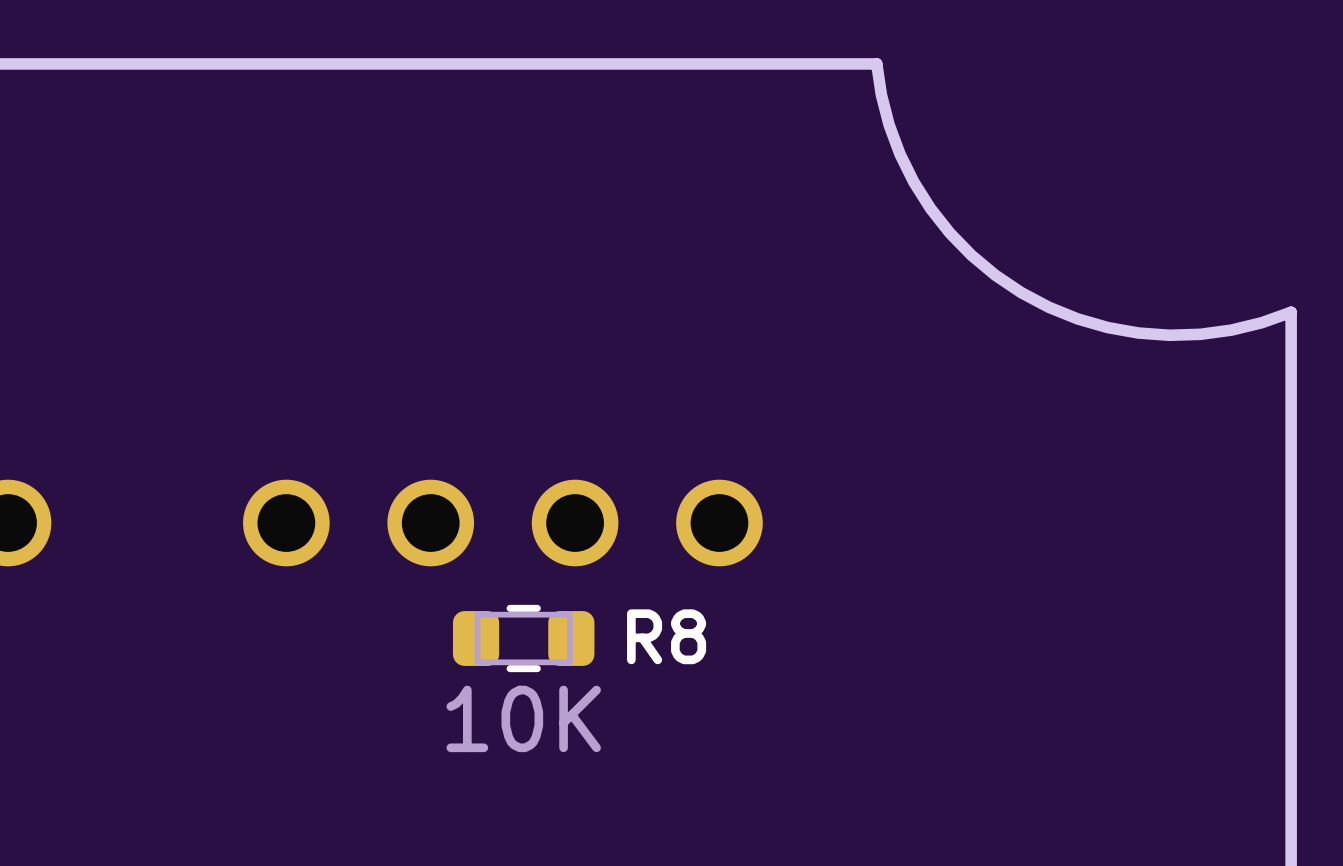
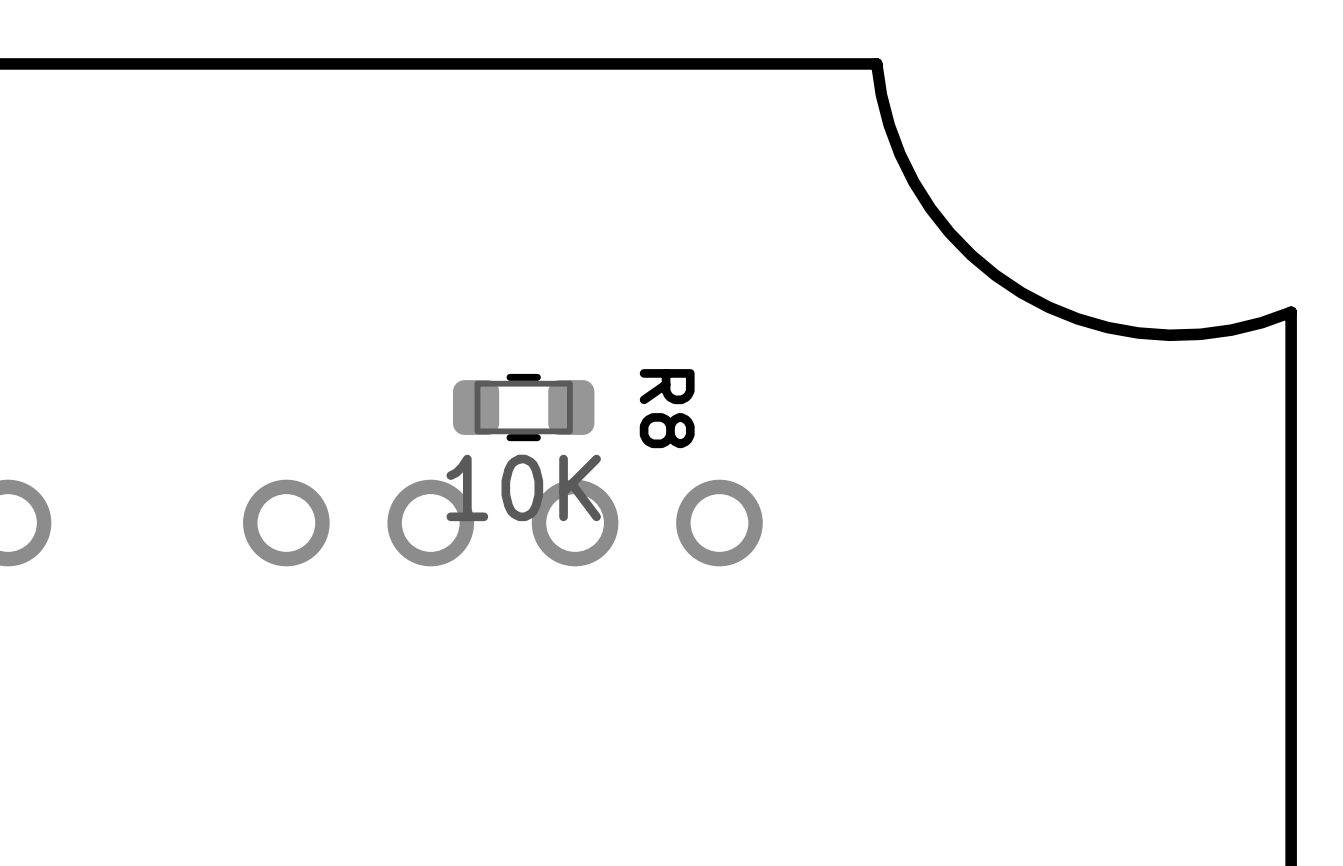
R8 name rotation: 0° (666, 636) -> 90° clockwise (667, 408)
R8 position: (523, 638) -> (523, 407)

